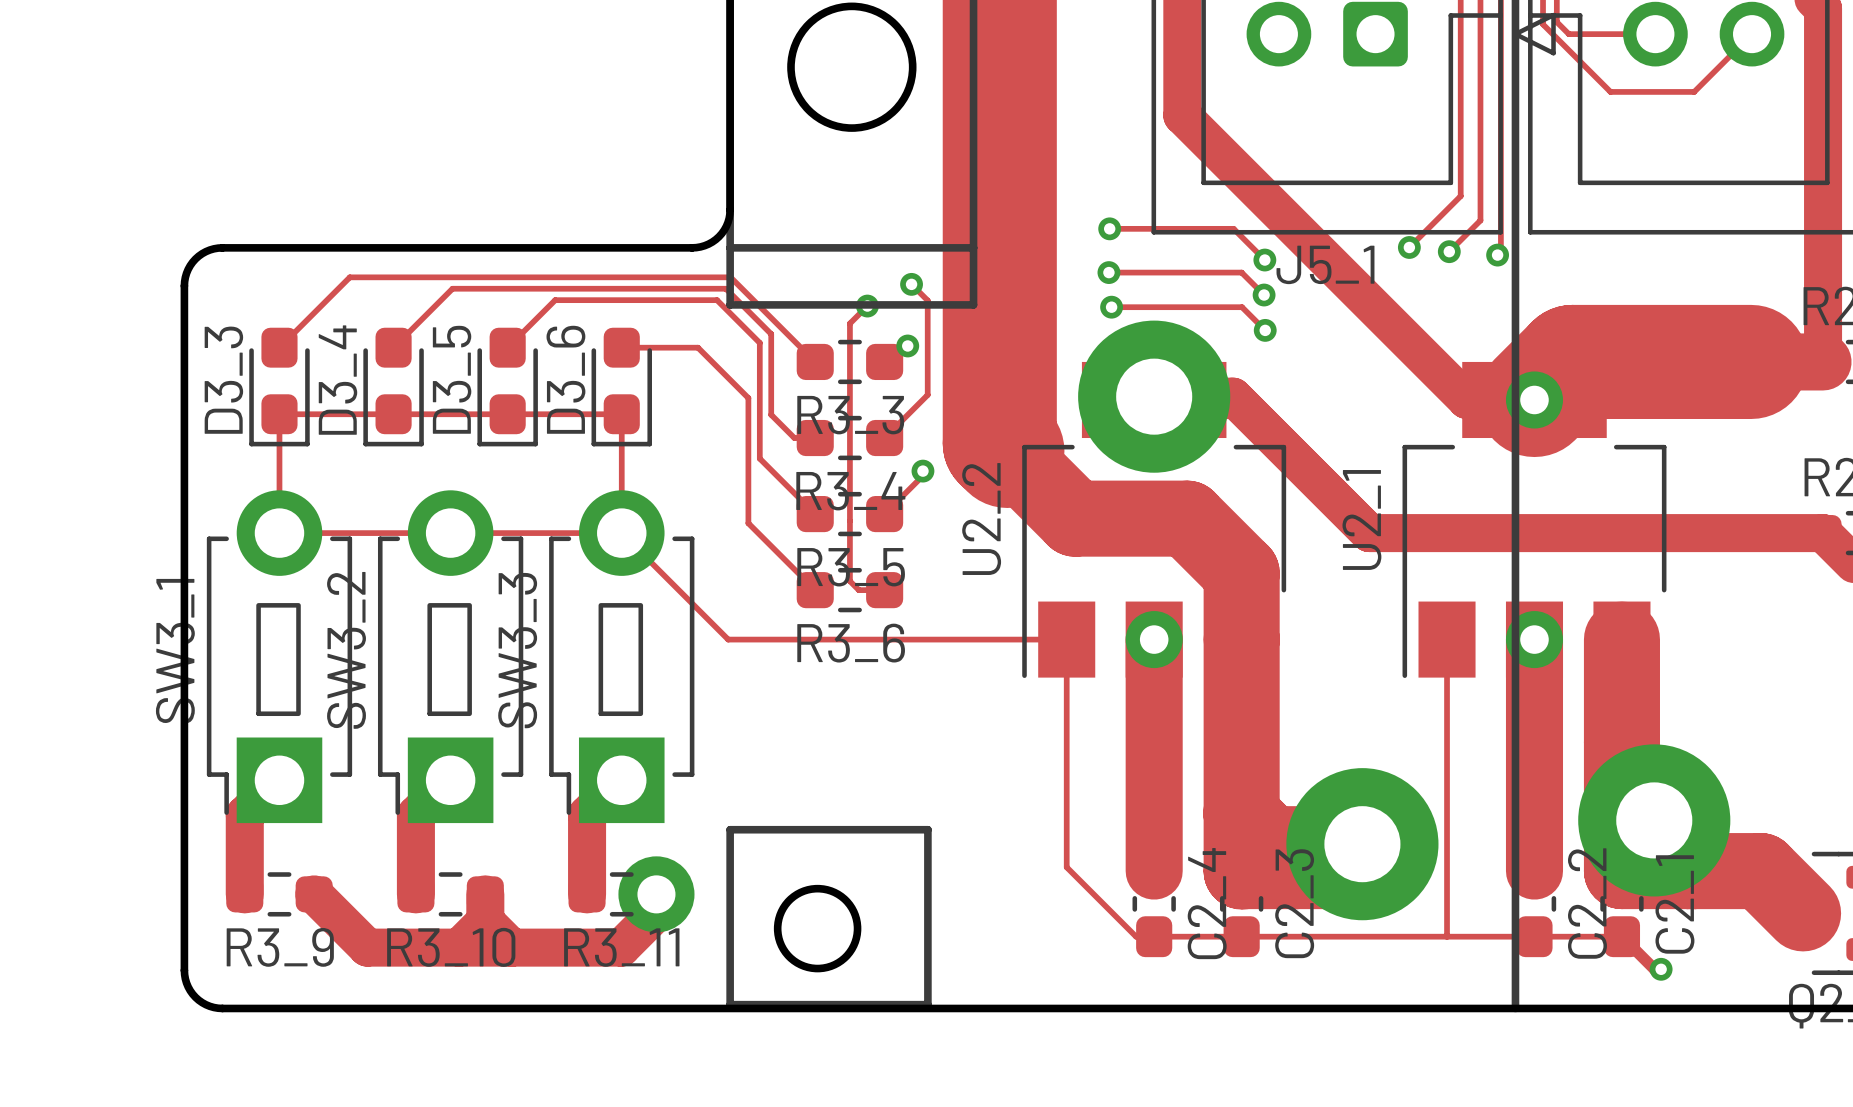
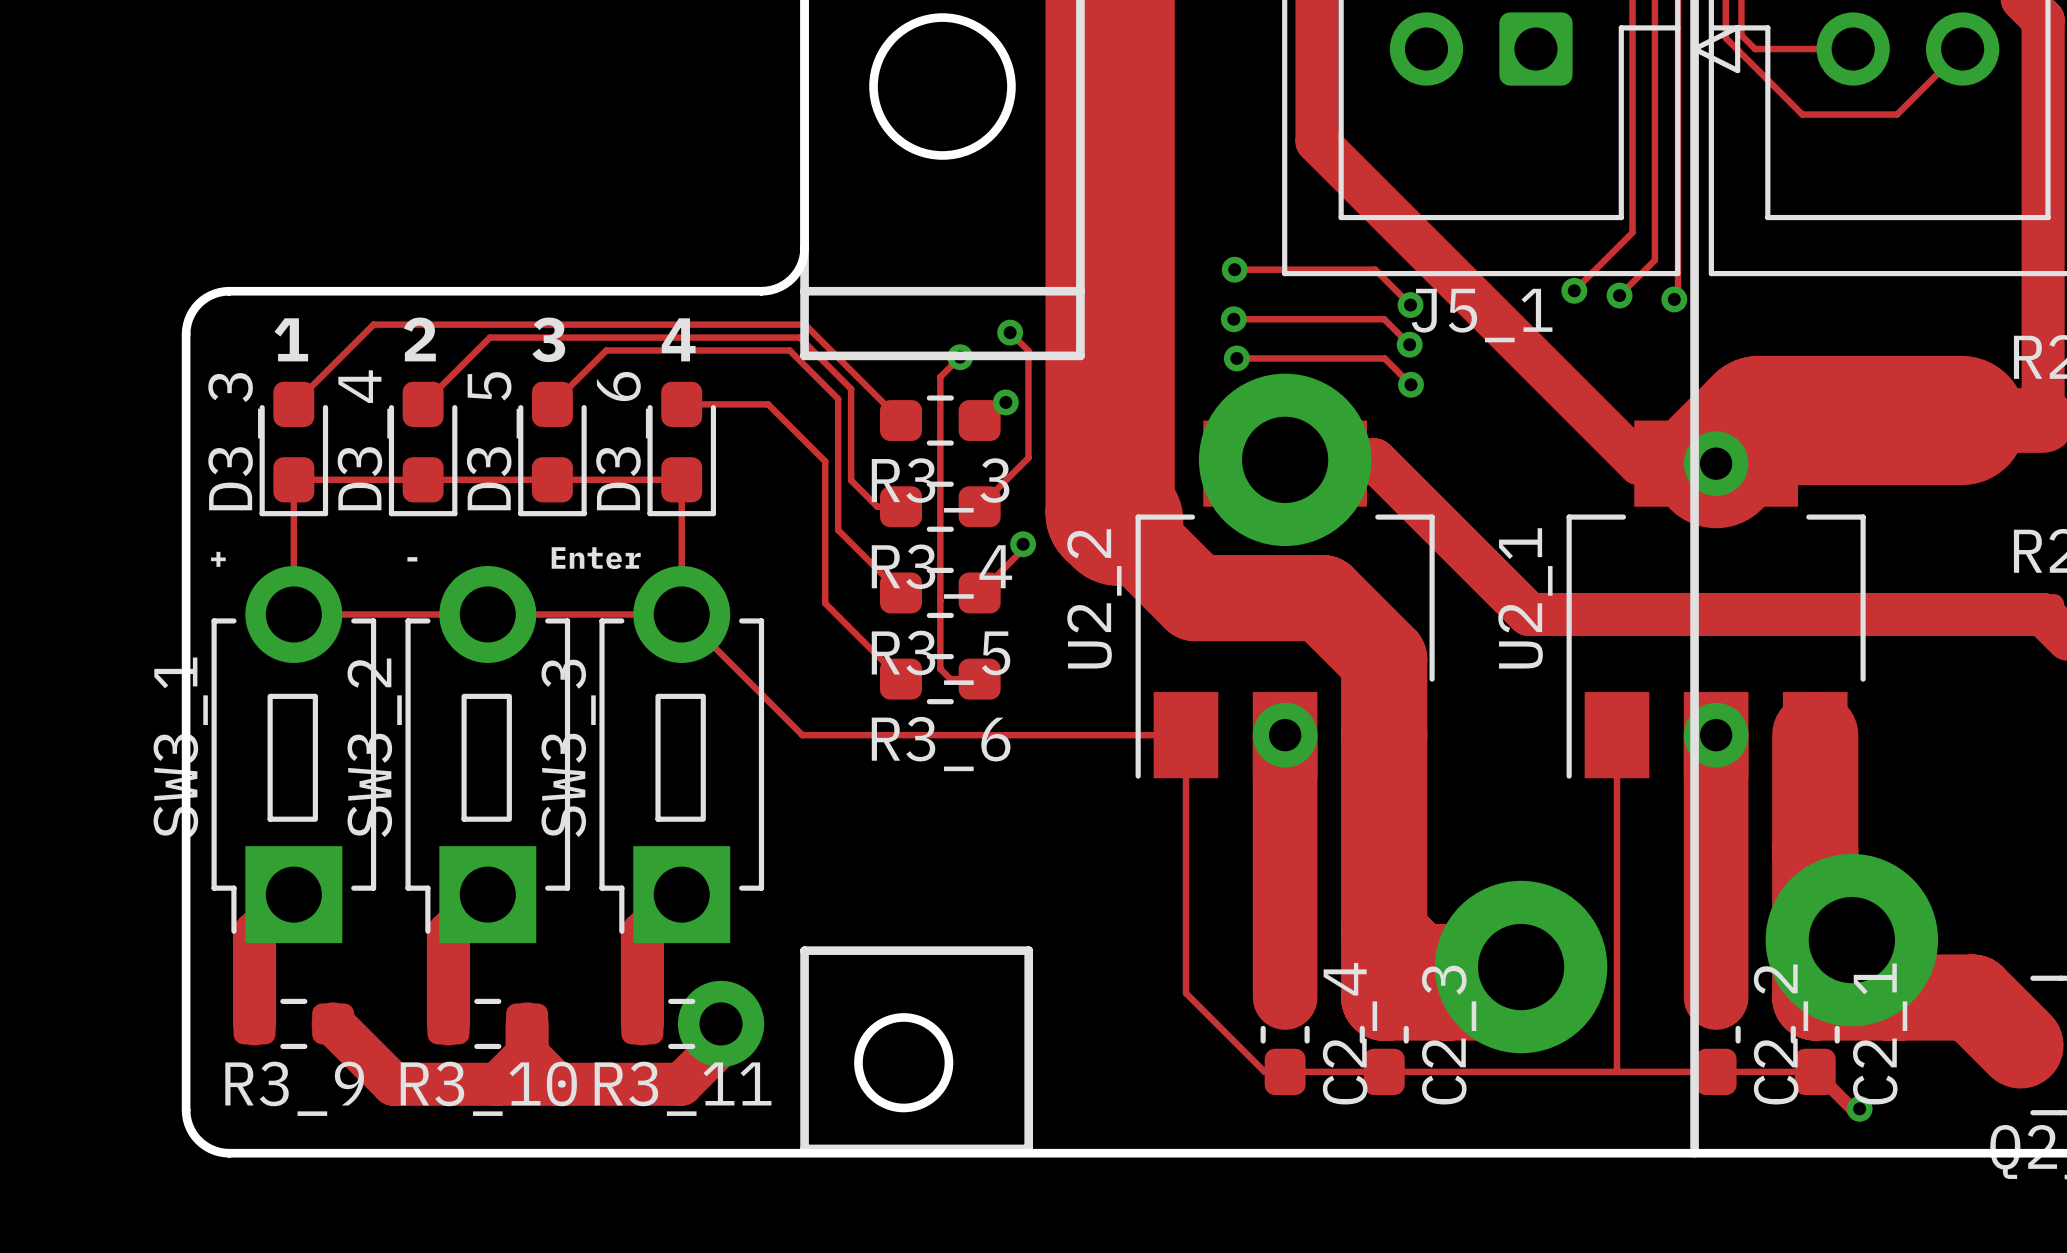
text: none -> 1 (291, 339)
text: none -> 2 (419, 339)
text: none -> 3 (548, 339)
text: none -> 4 (678, 339)
text: none -> Enter (596, 558)
text: none -> + (218, 559)
text: none -> - (412, 559)

